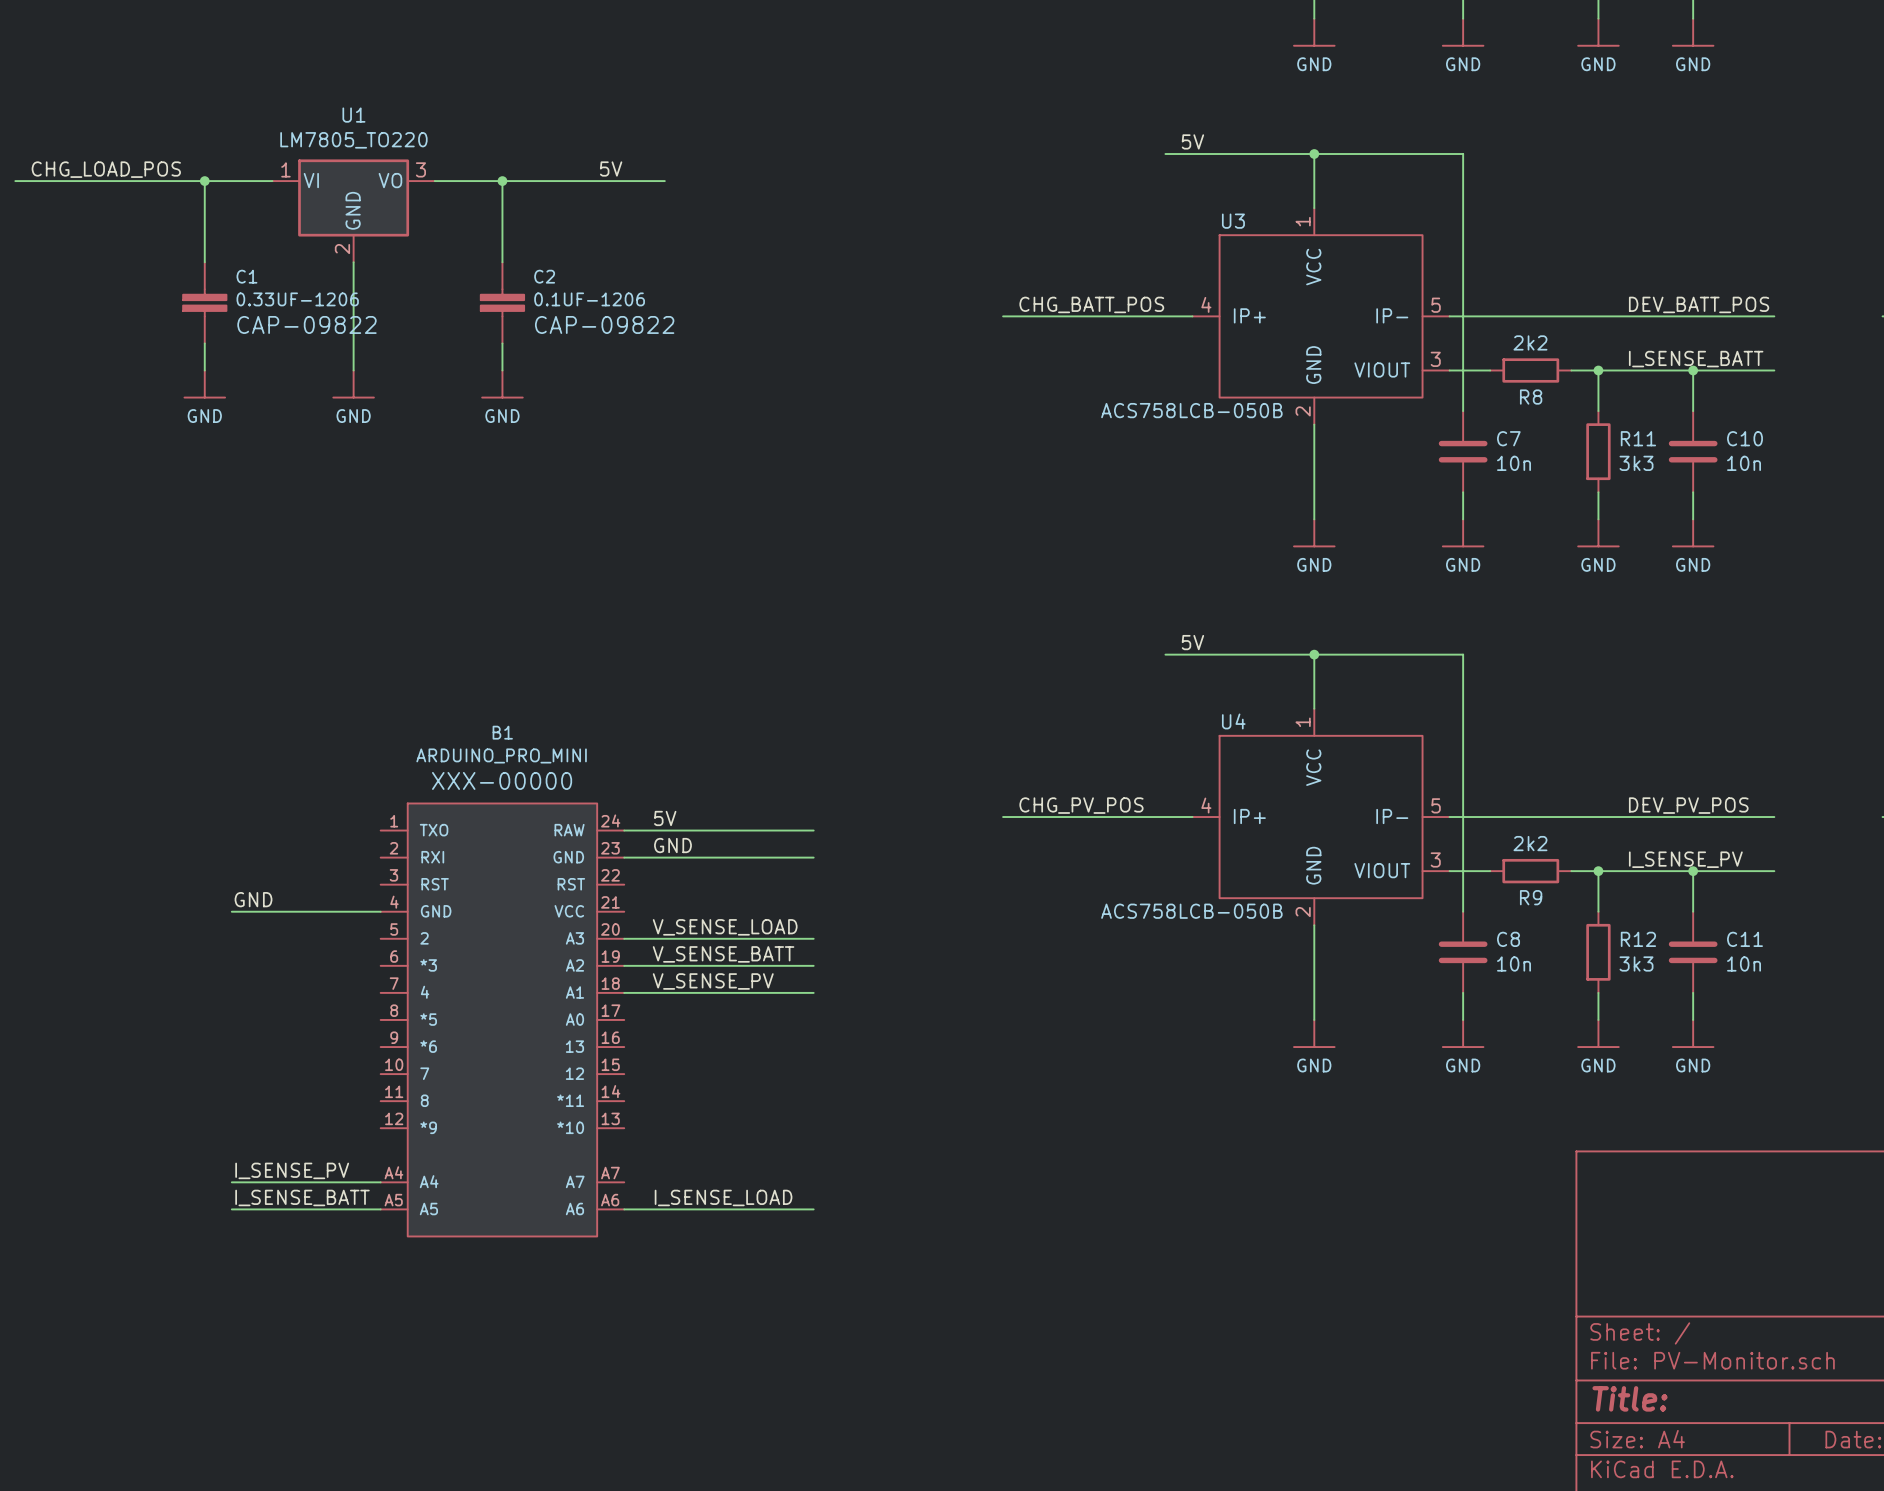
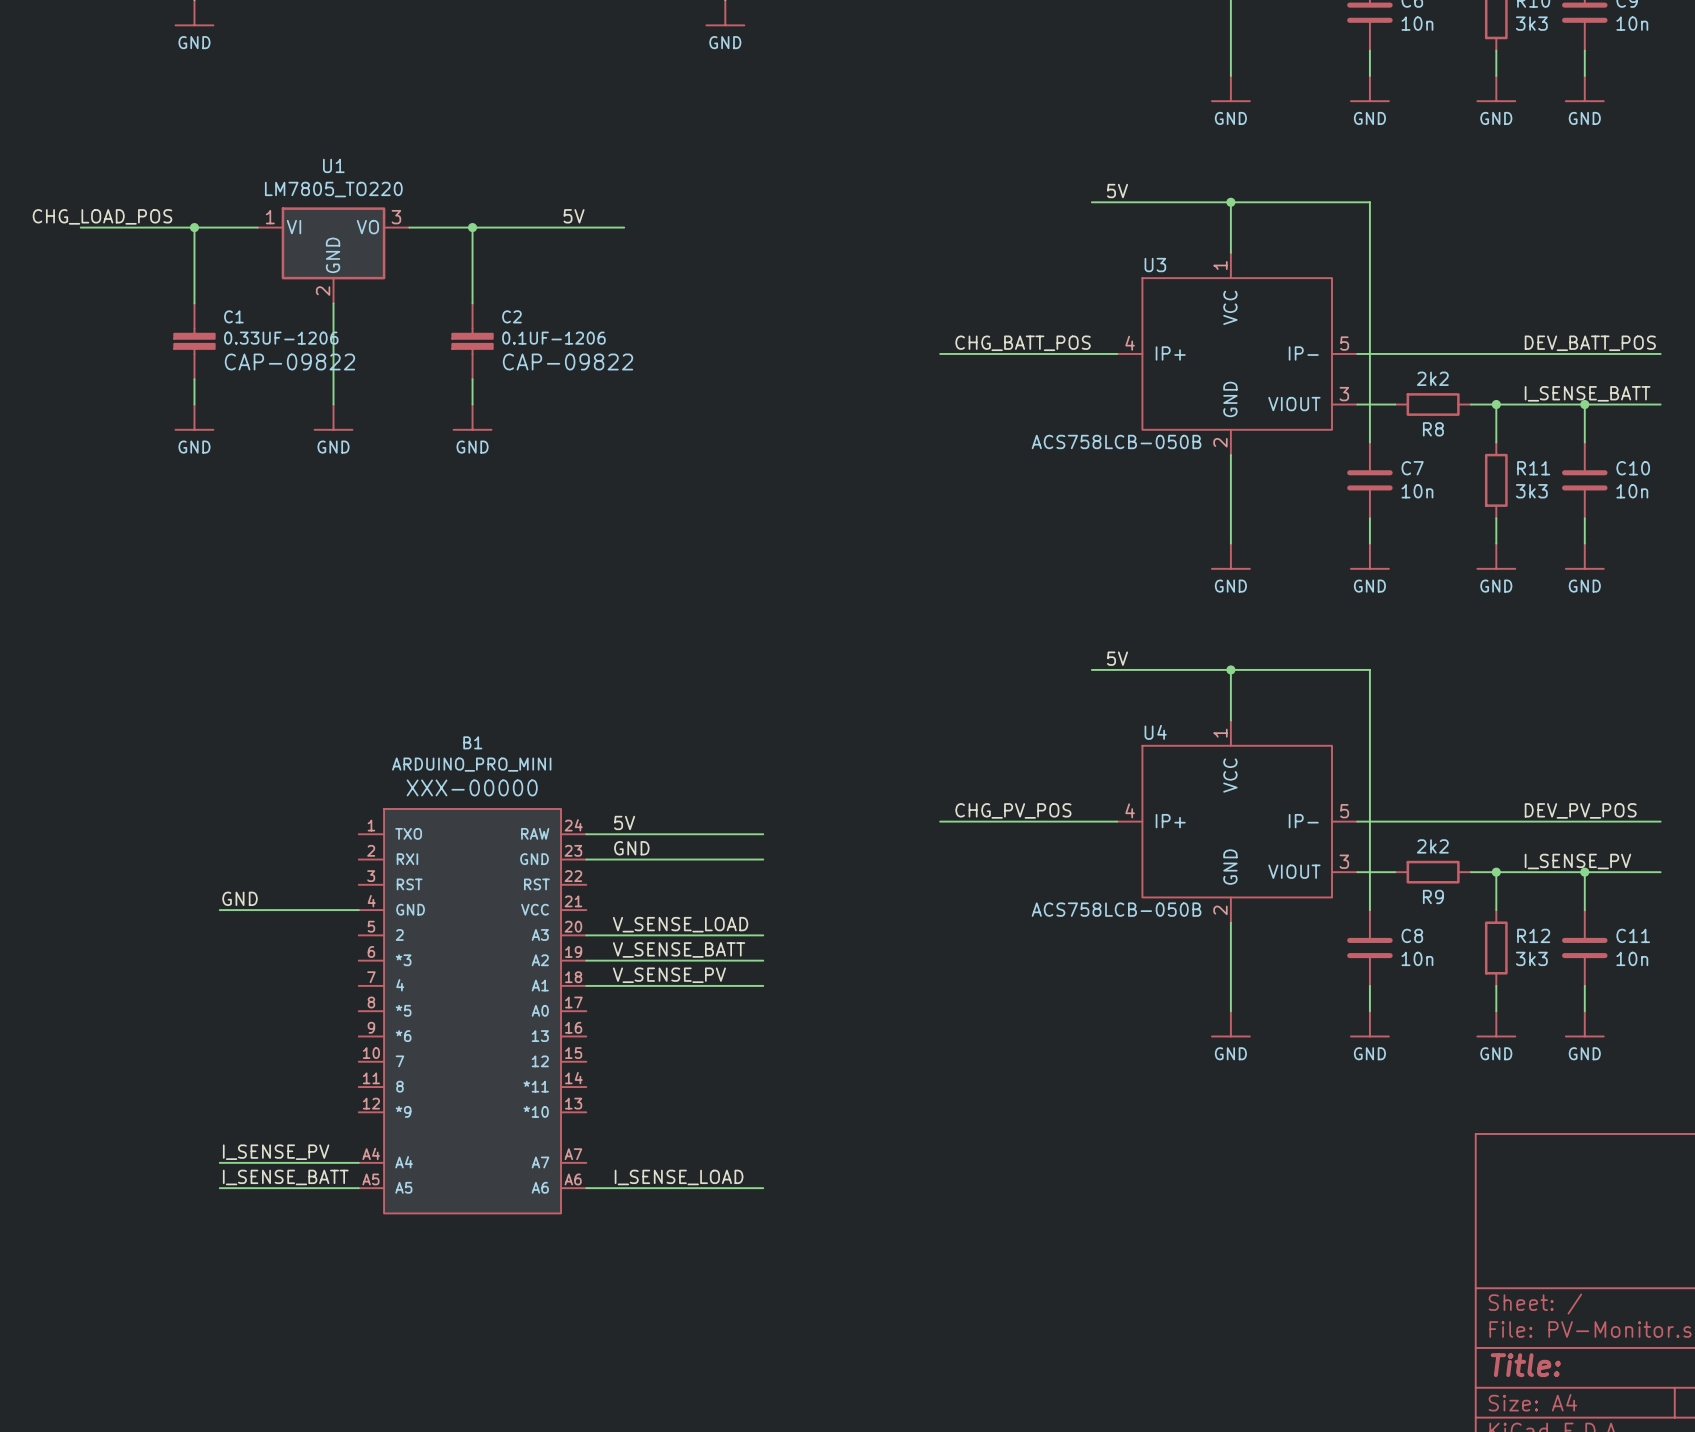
wire: (15, 181) (83, 181) -> none

